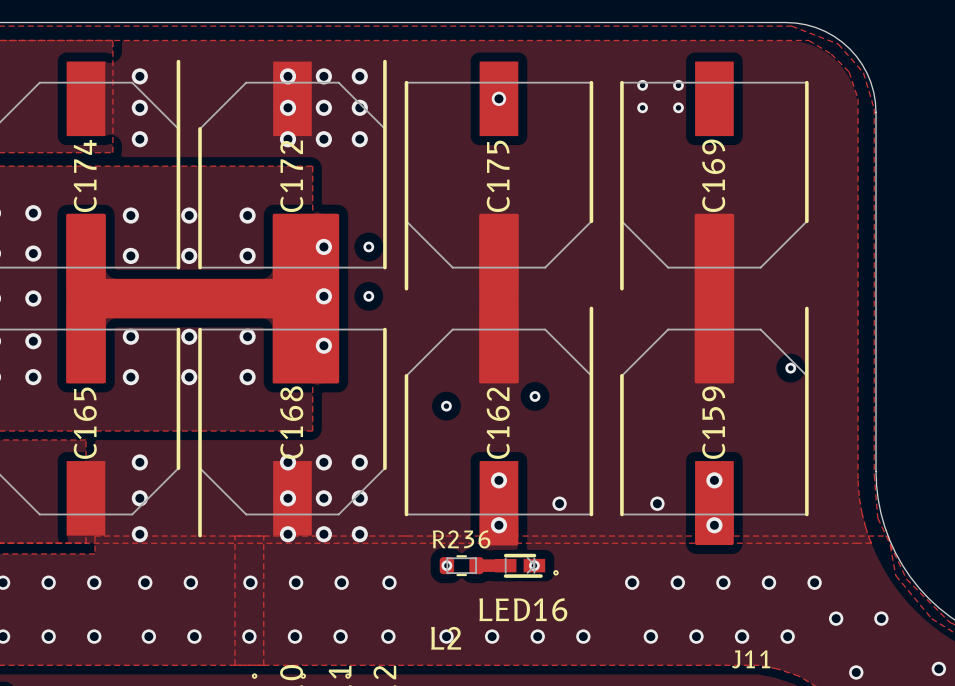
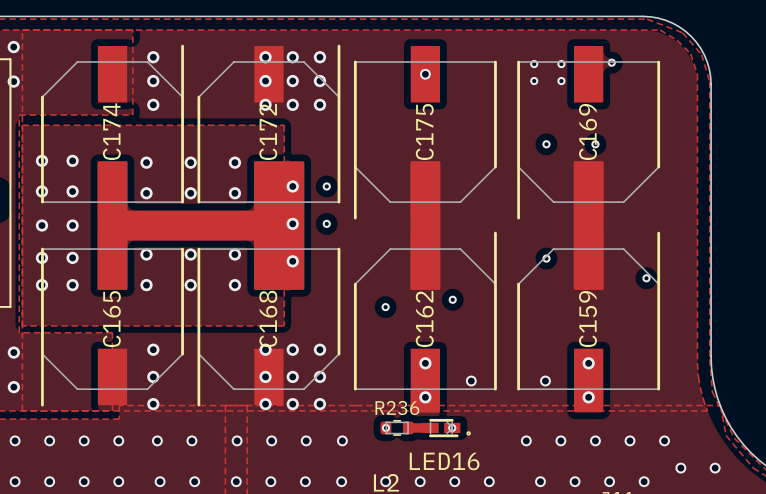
via: none -> (611, 62)
via: none -> (546, 144)
via: none -> (595, 144)
via: none -> (546, 258)

